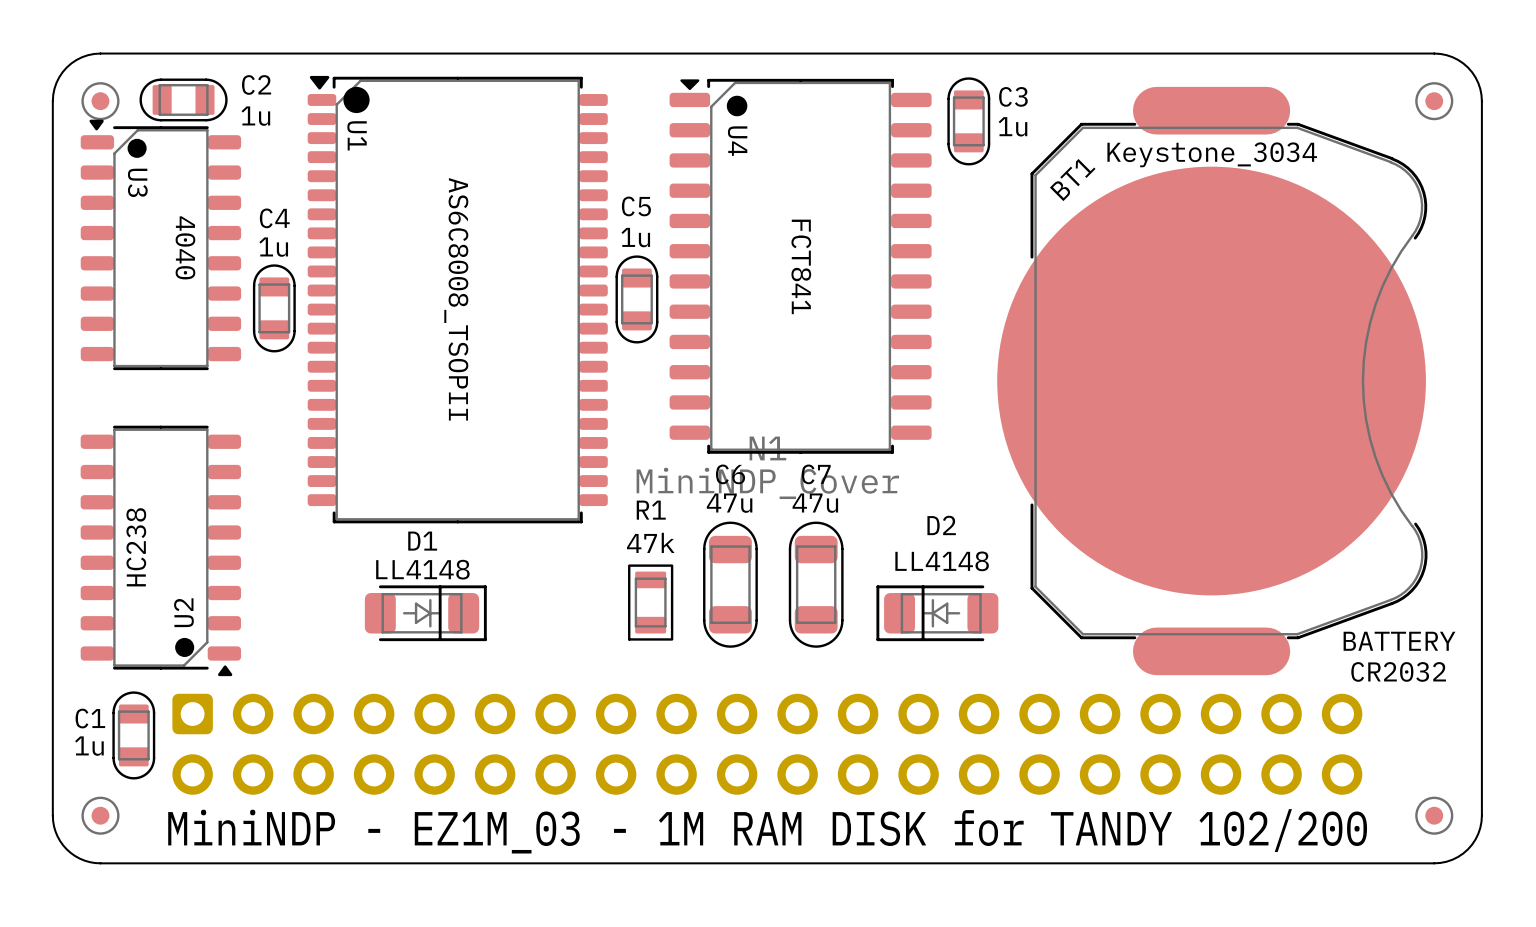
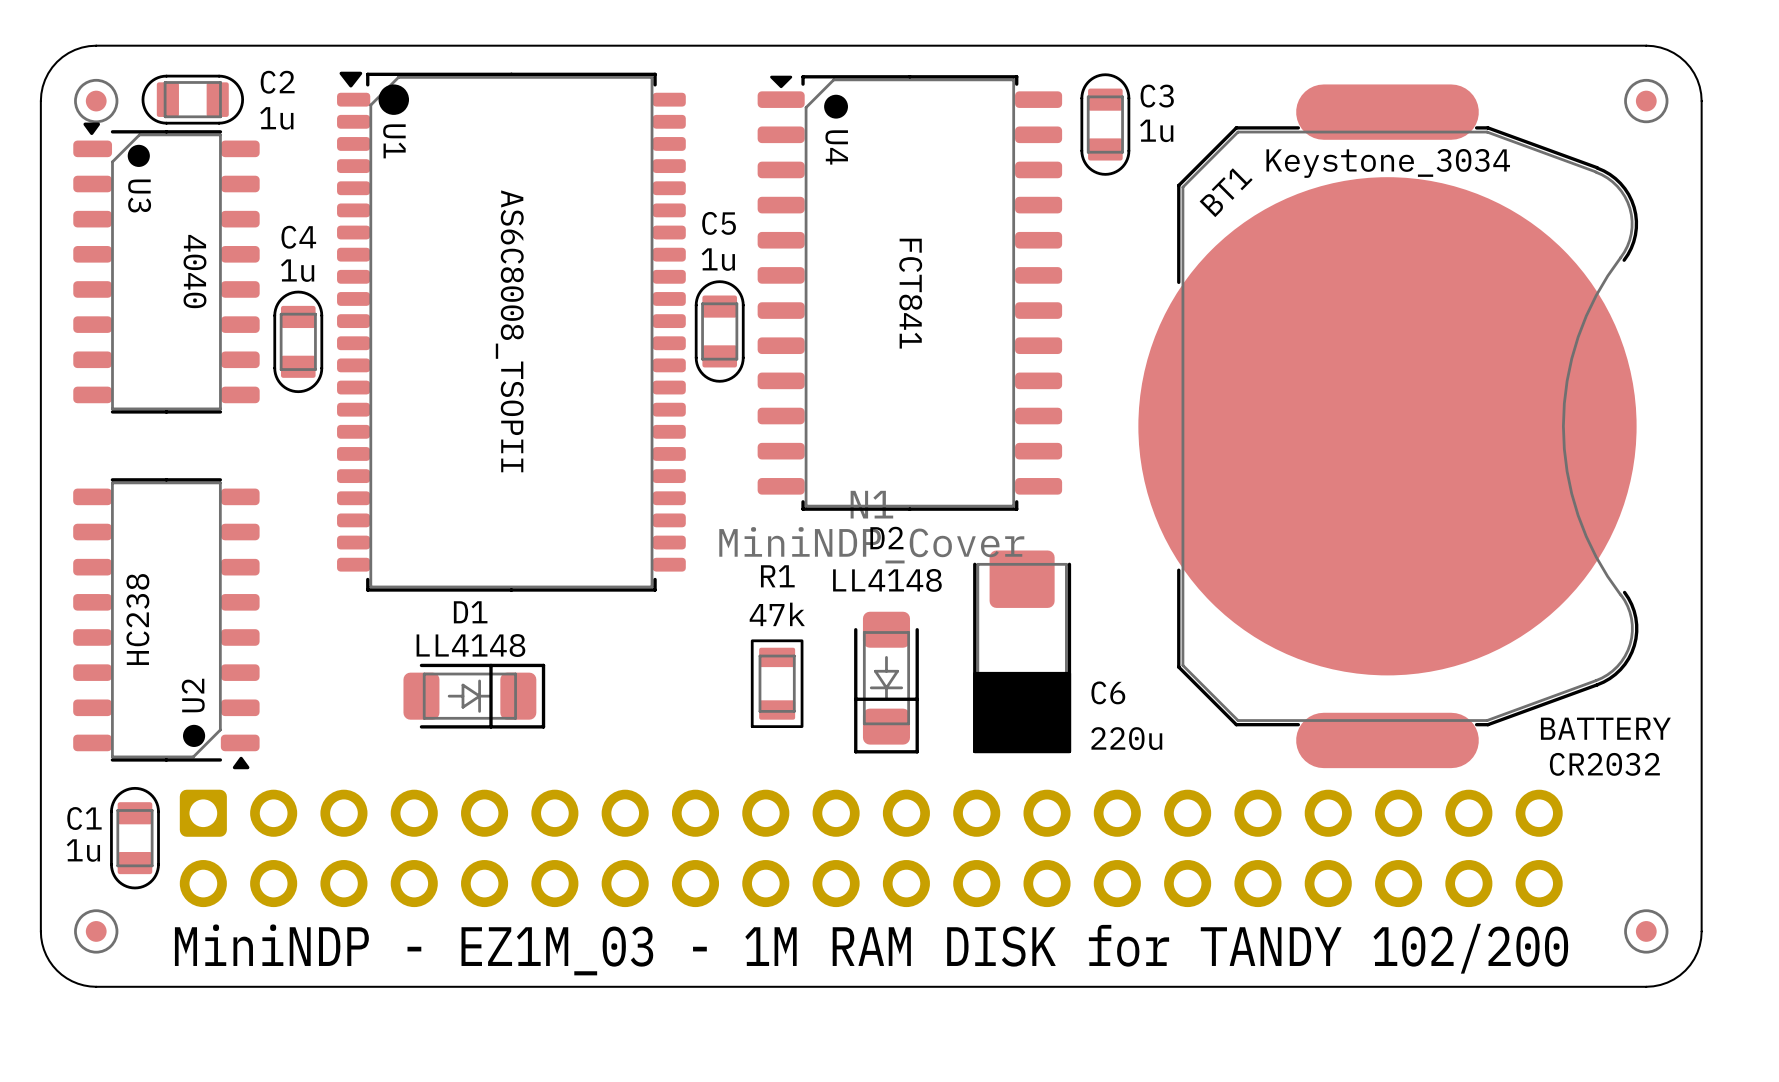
C6 name position: C6 (730, 474) -> C6 (1108, 692)
C6 value: 47u (729, 503) -> 220u (1126, 738)
C6 footprint: [703, 521, 758, 648] -> [973, 550, 1072, 754]
C7: 47u (816, 584) -> none
R1 position: (650, 602) -> (777, 683)
D2 rotation: 0° (937, 613) -> 90° counterclockwise (886, 682)
D2 position: (937, 613) -> (886, 682)

